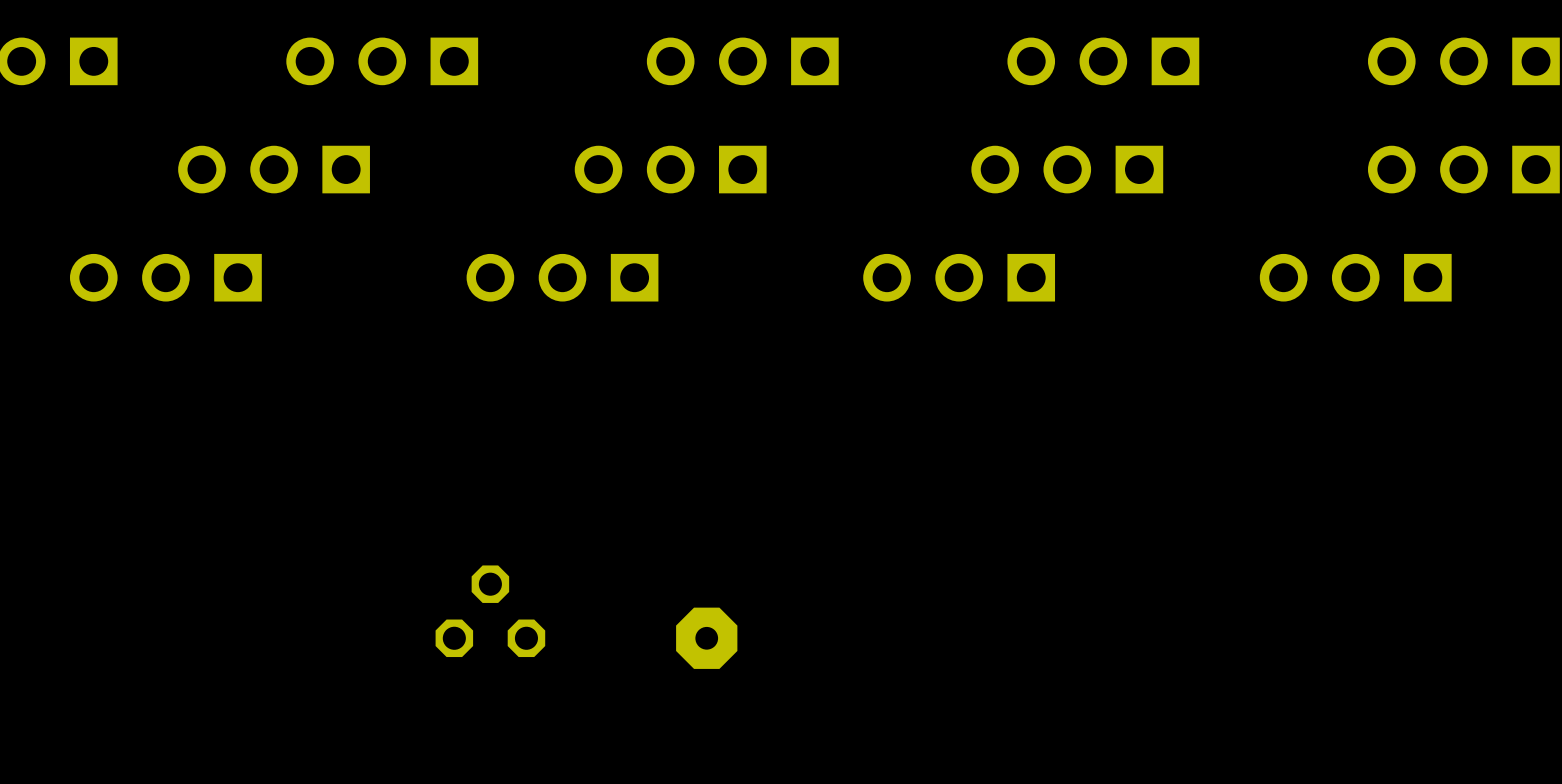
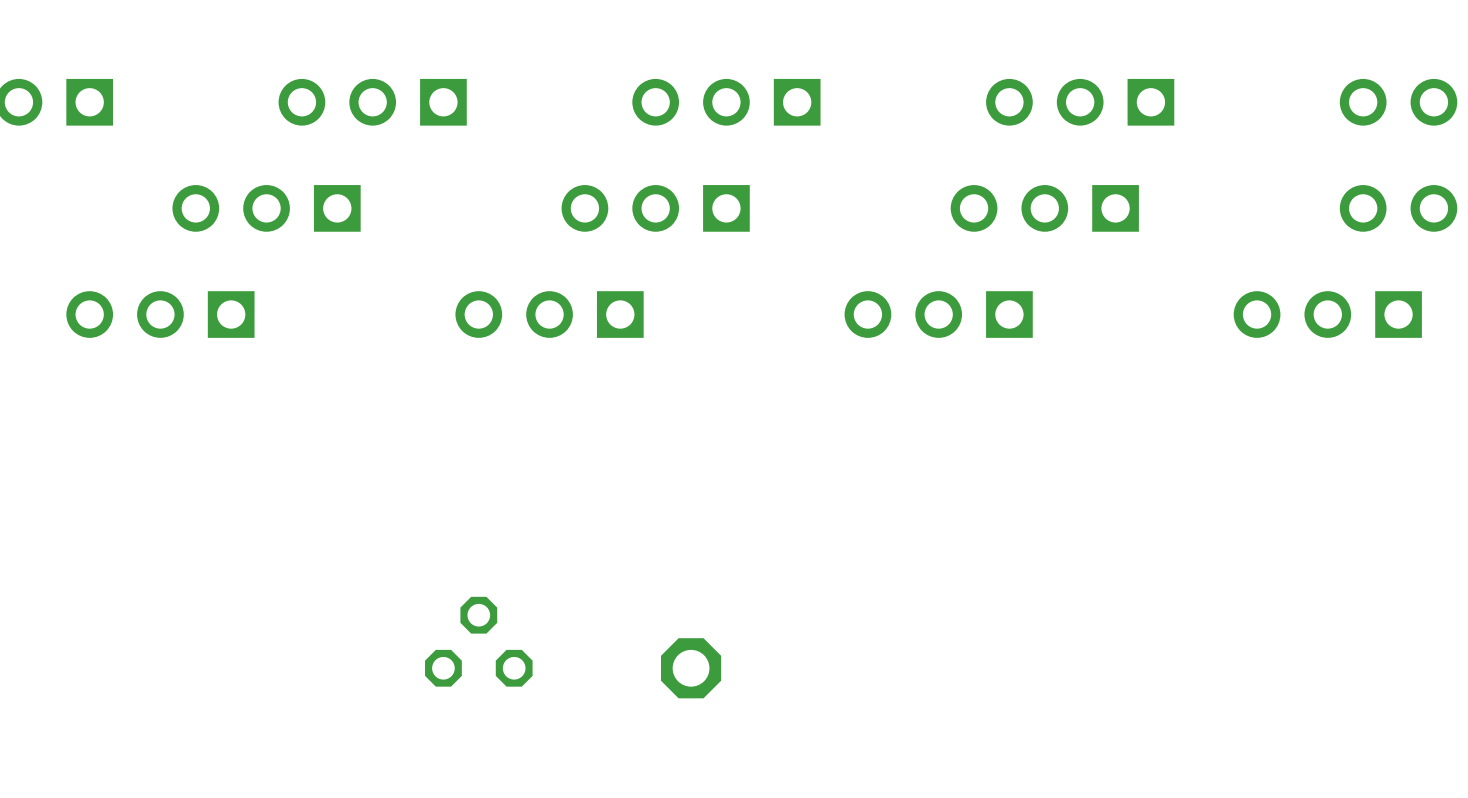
part footprint: [676, 607, 738, 669] -> [660, 638, 722, 699]

